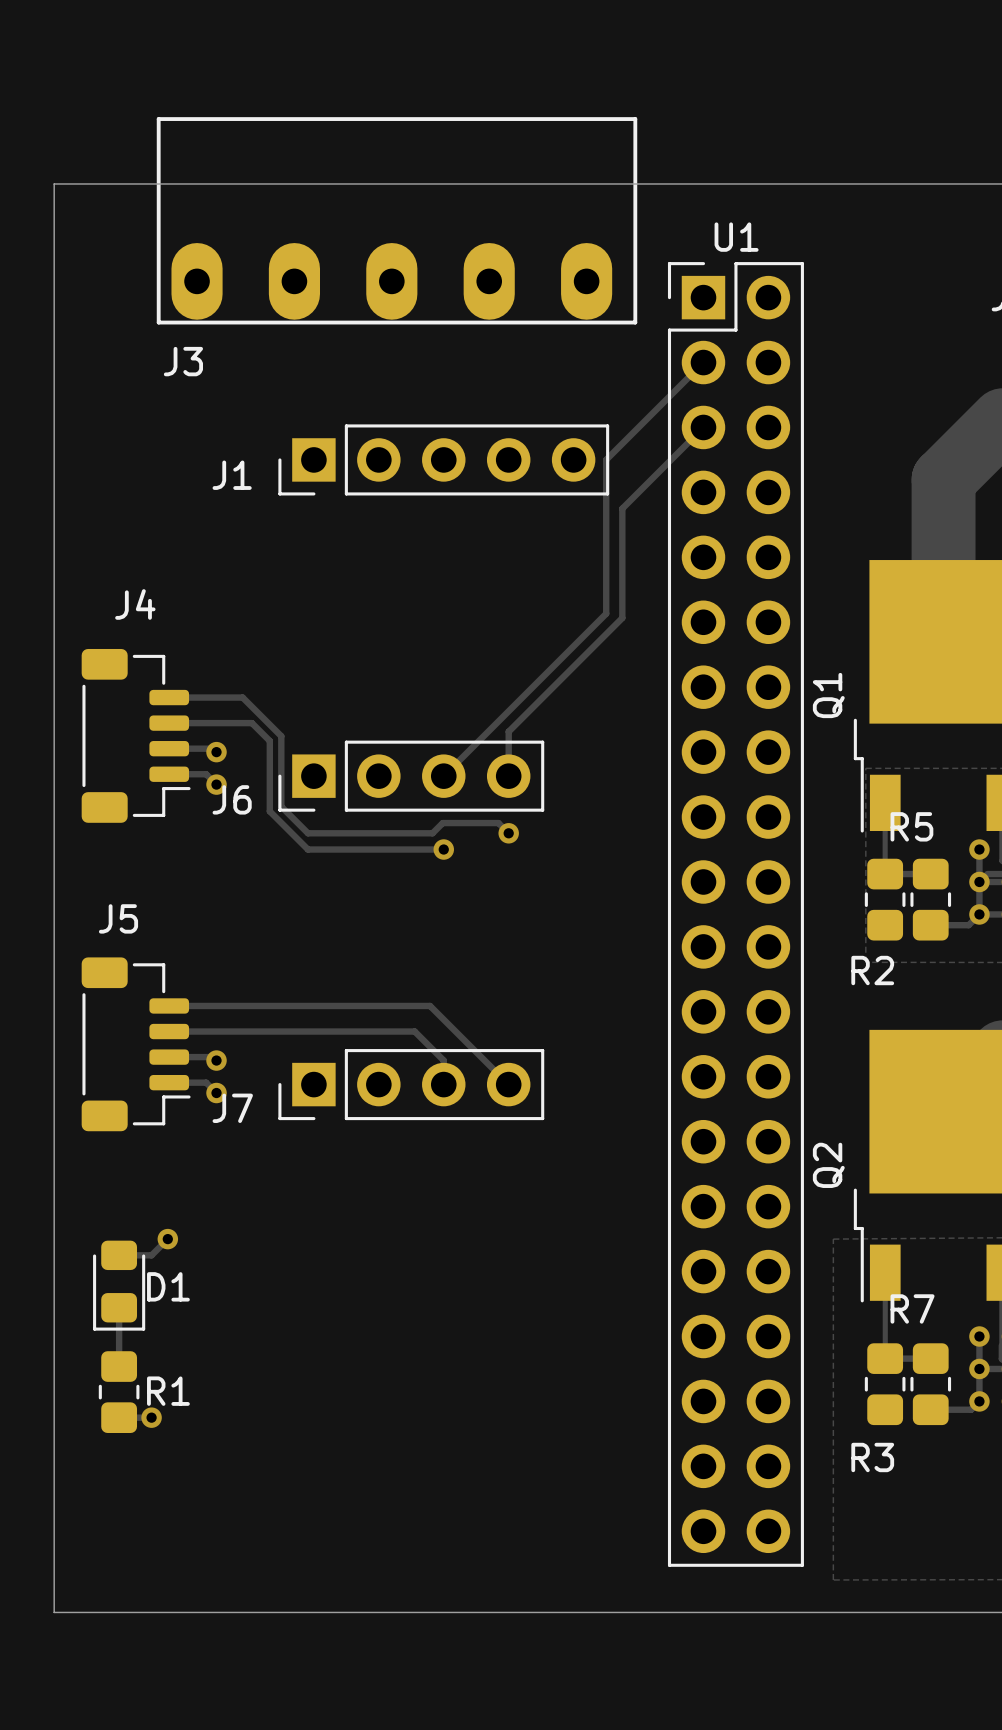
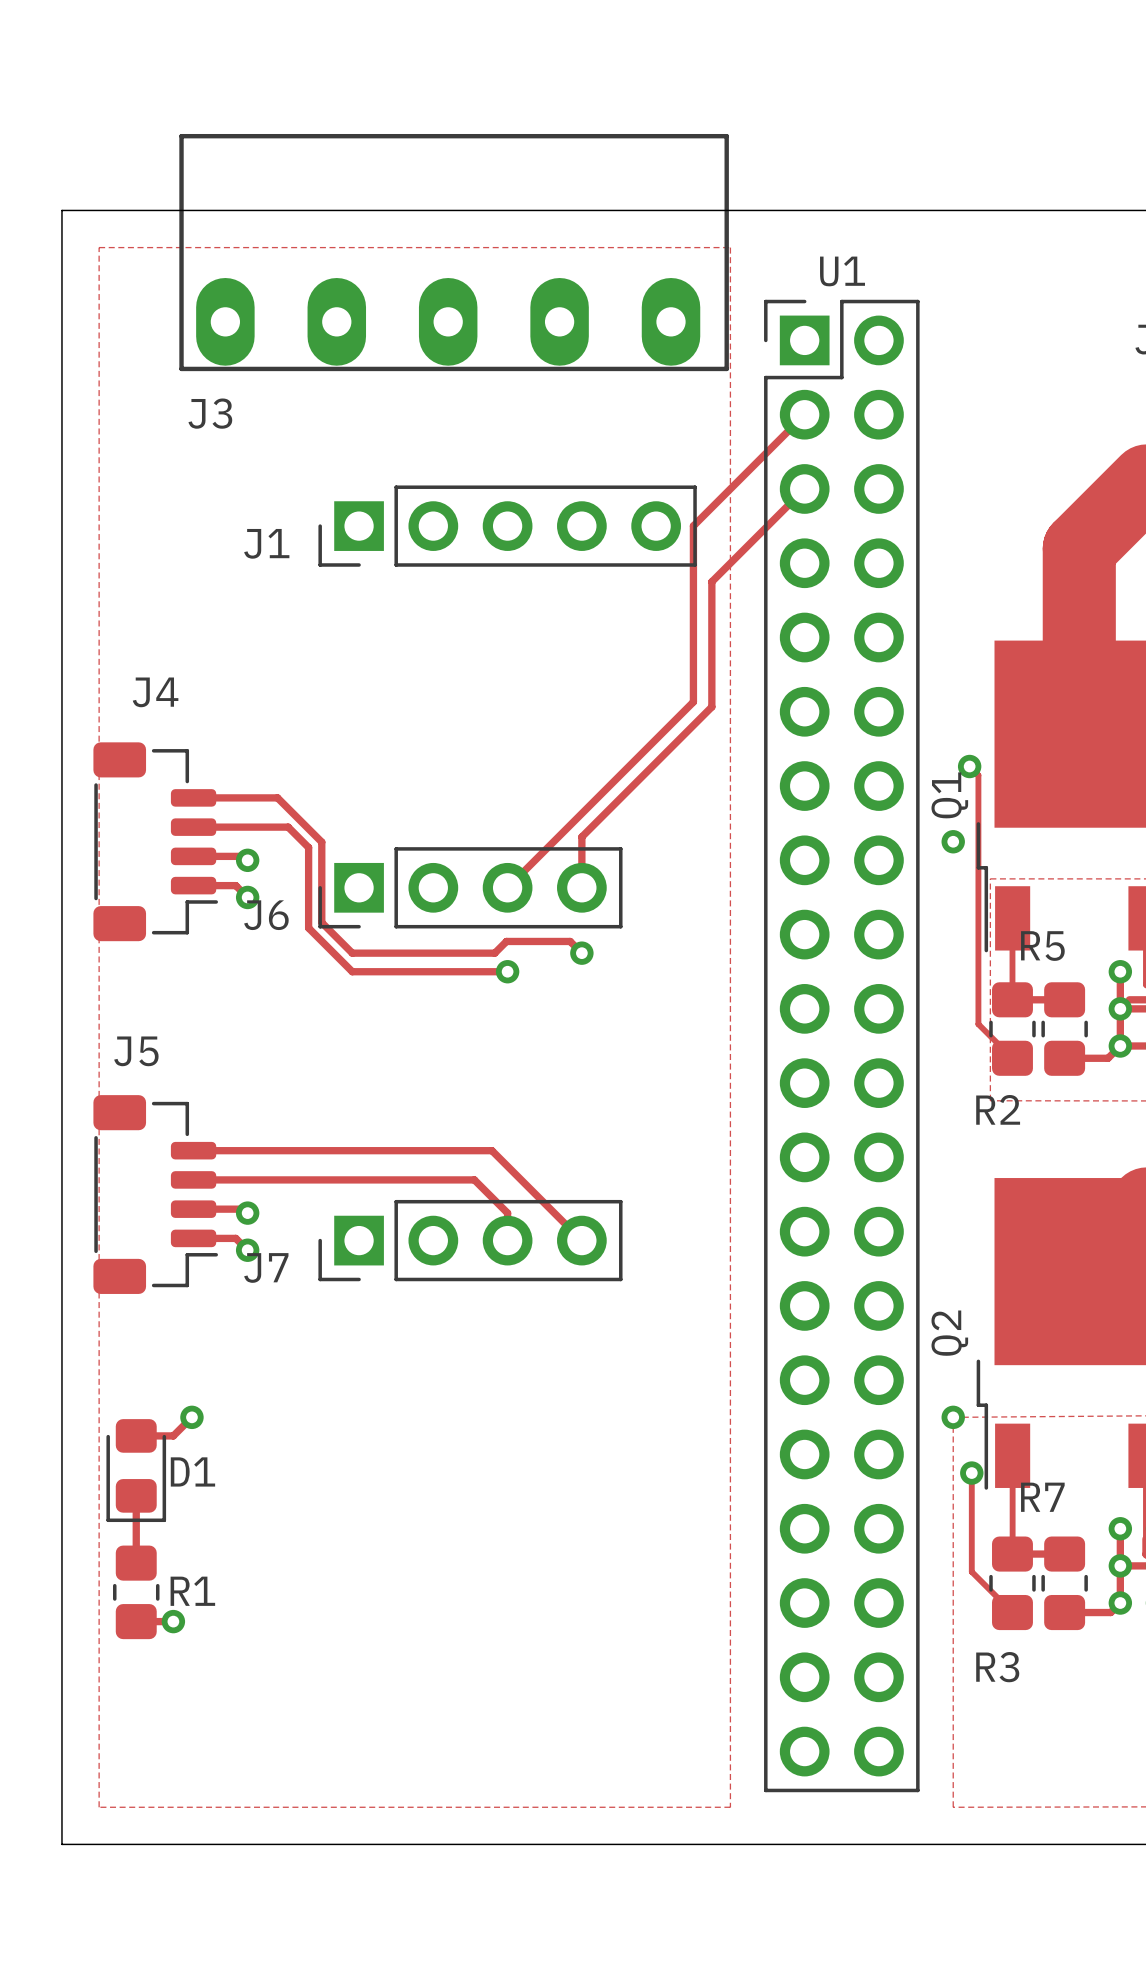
zone outline: none -> (99, 247) (99, 1807) (730, 1807) (730, 247) (99, 247)
track: none -> (969, 766) (978, 775) (978, 1024) (1012, 1058)
via: none -> (969, 766)
via: none -> (953, 841)
via: none -> (953, 1417)
track: none -> (971, 1473) (971, 1571) (1012, 1612)
via: none -> (971, 1473)

